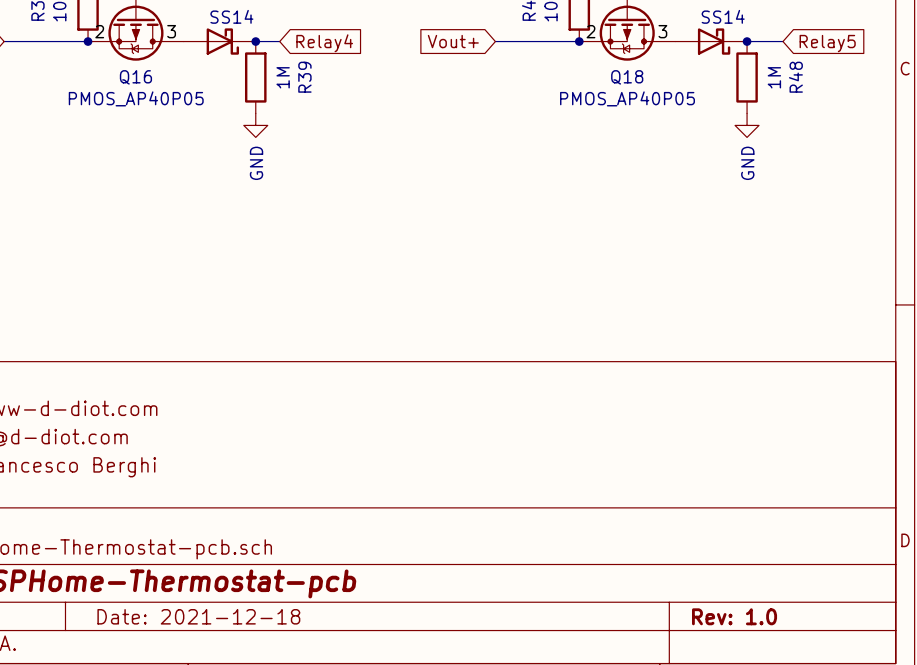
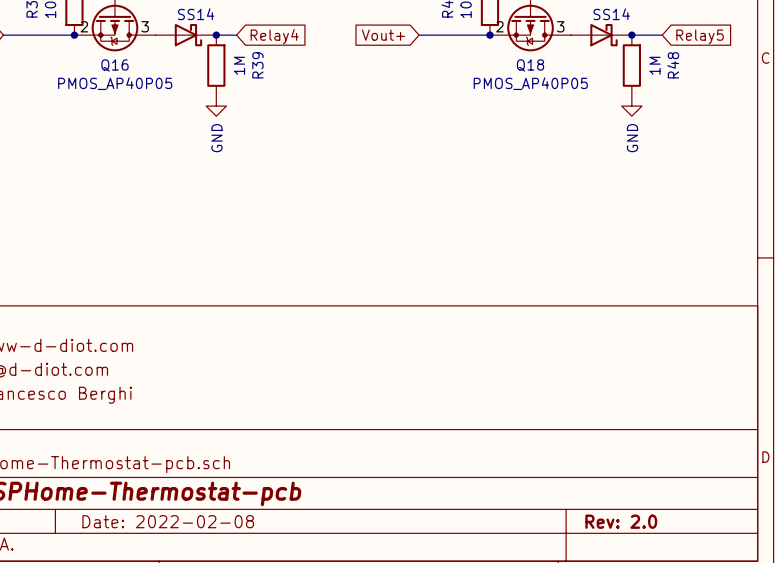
title block: Date: 2021-12-18 (198, 616) -> Date: 2022-02-08 (168, 521)
title block: Rev: 1.0 (734, 616) -> Rev: 2.0 (621, 521)

